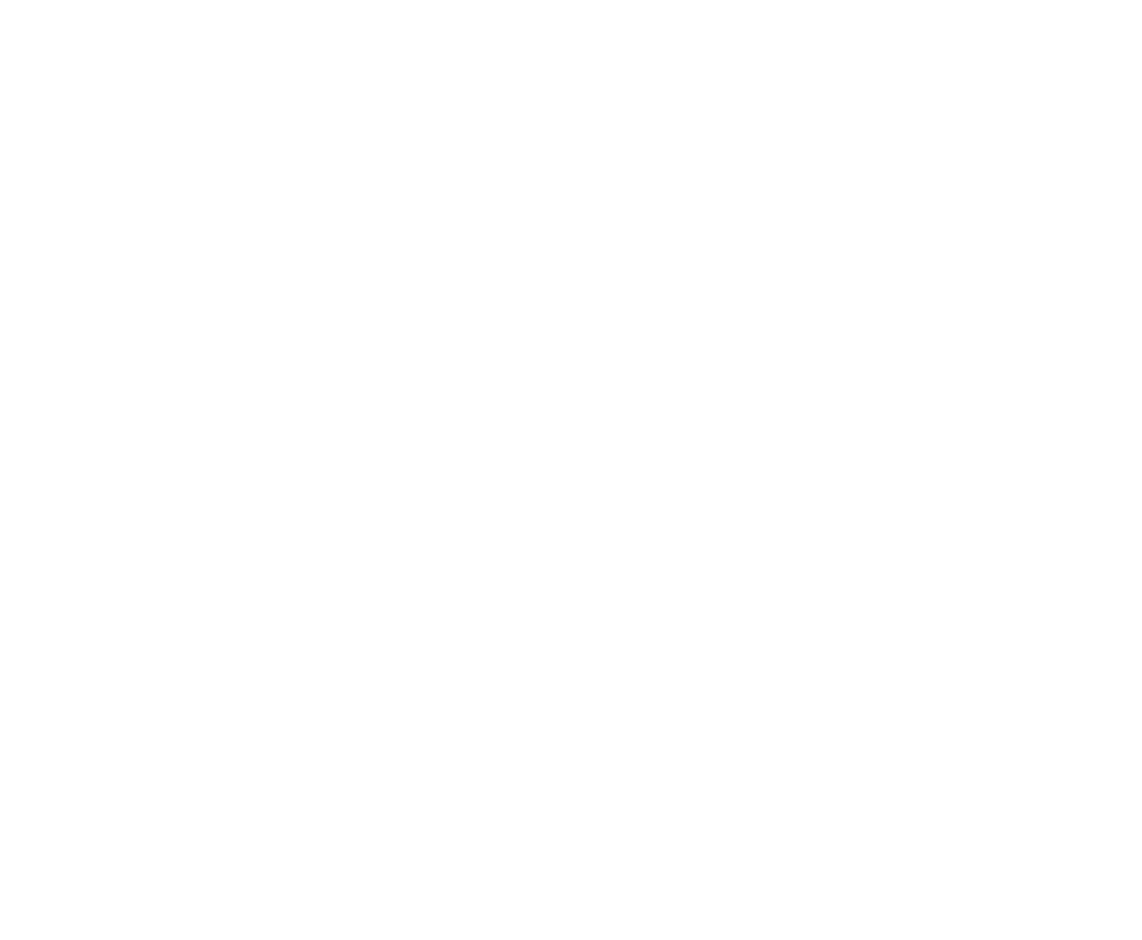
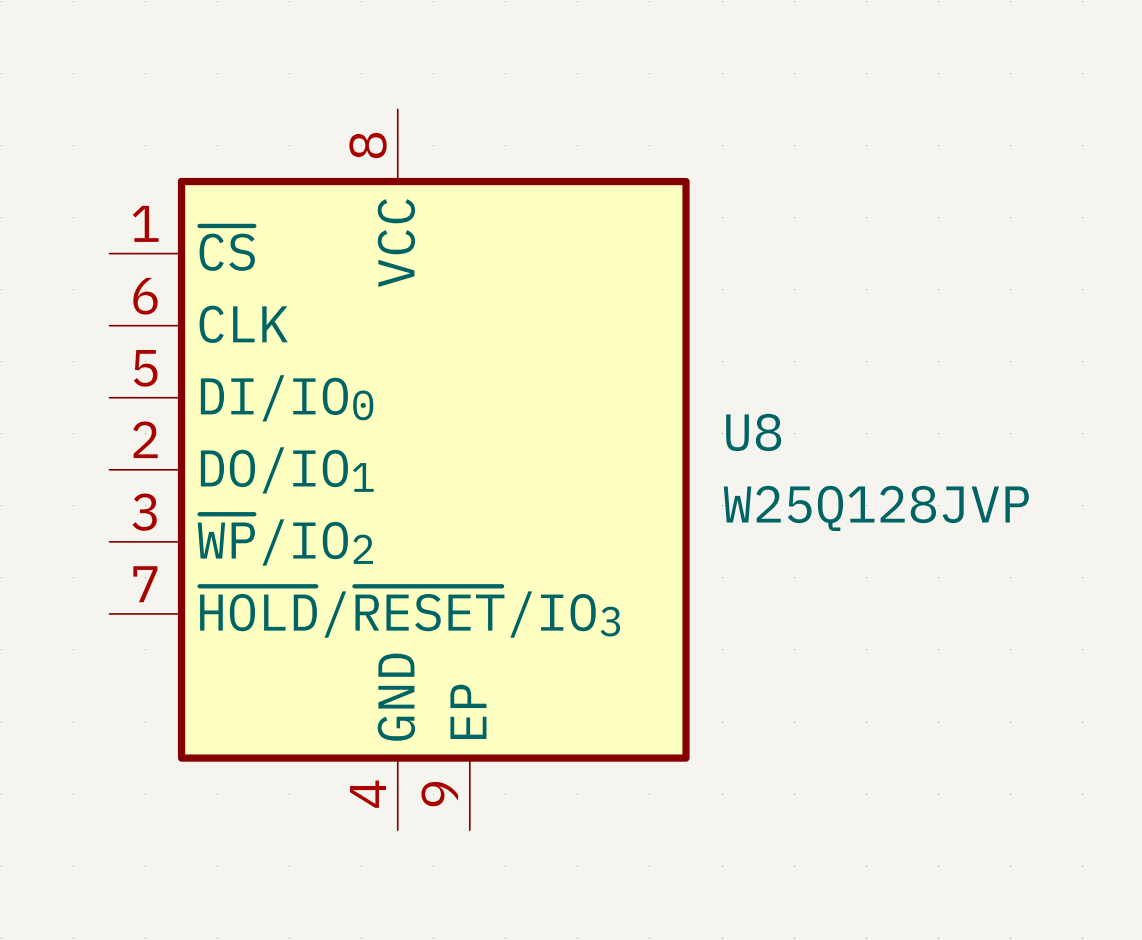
U8: none -> W25Q128JVP (399, 469)

